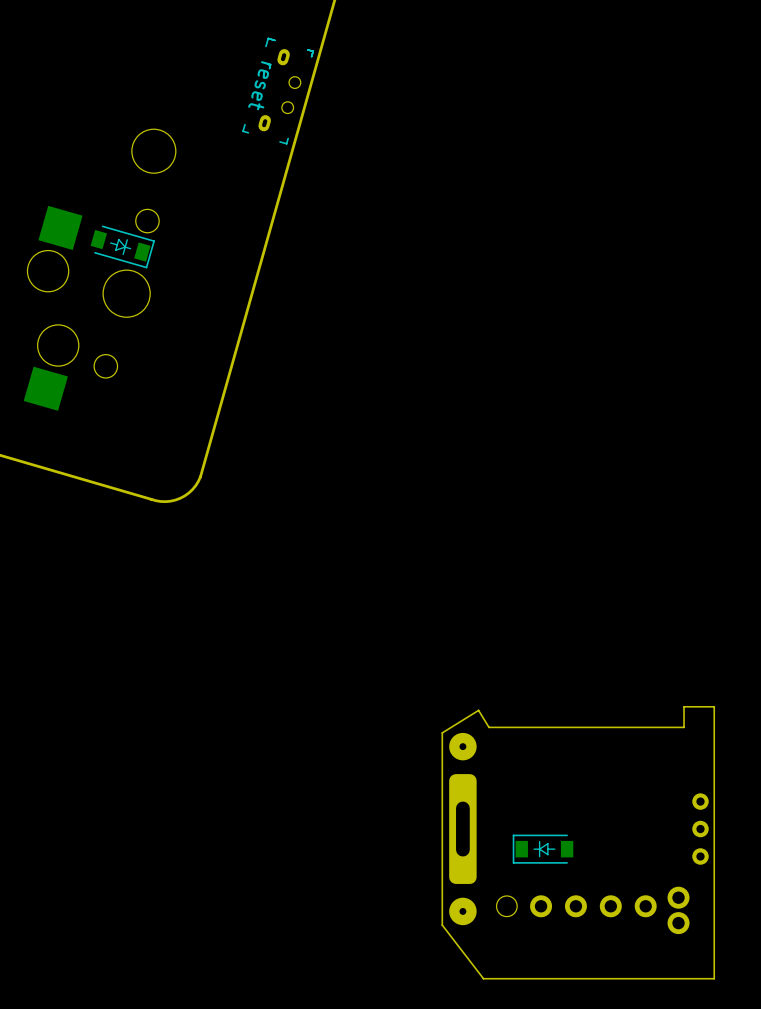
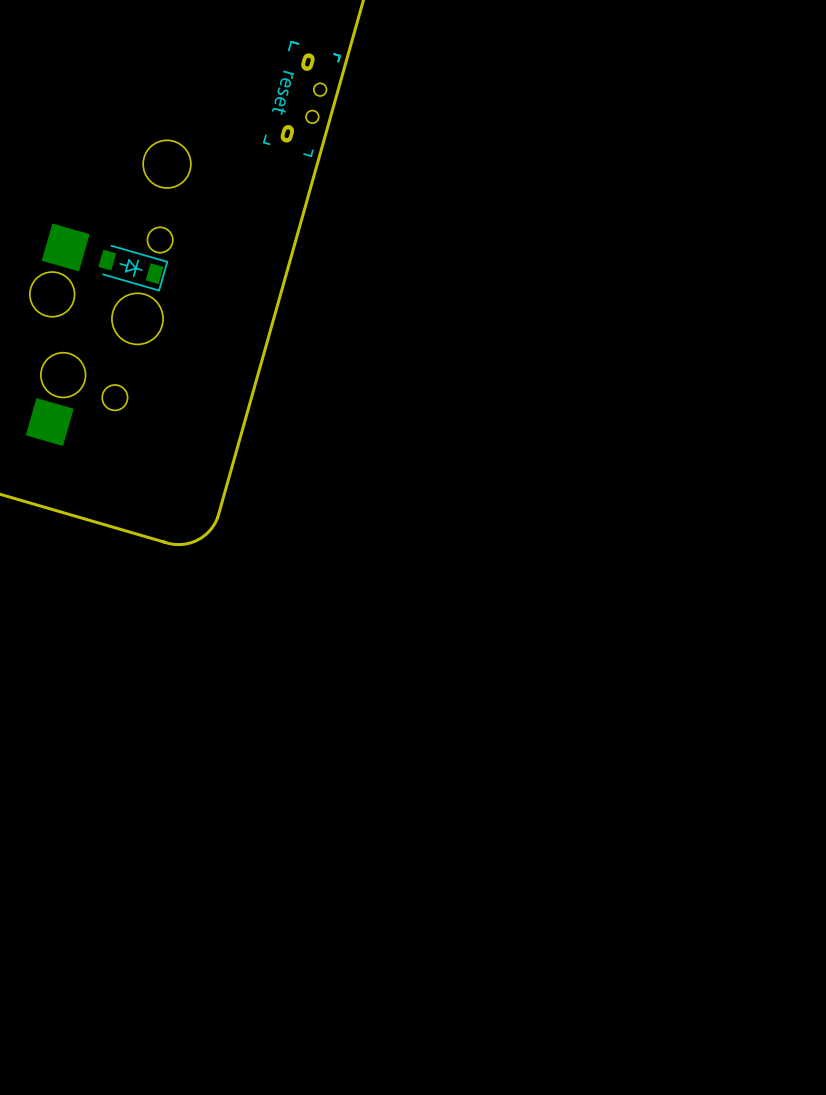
part: (578, 842) -> none
part: (542, 849) -> none
part: (593, 910) -> none

